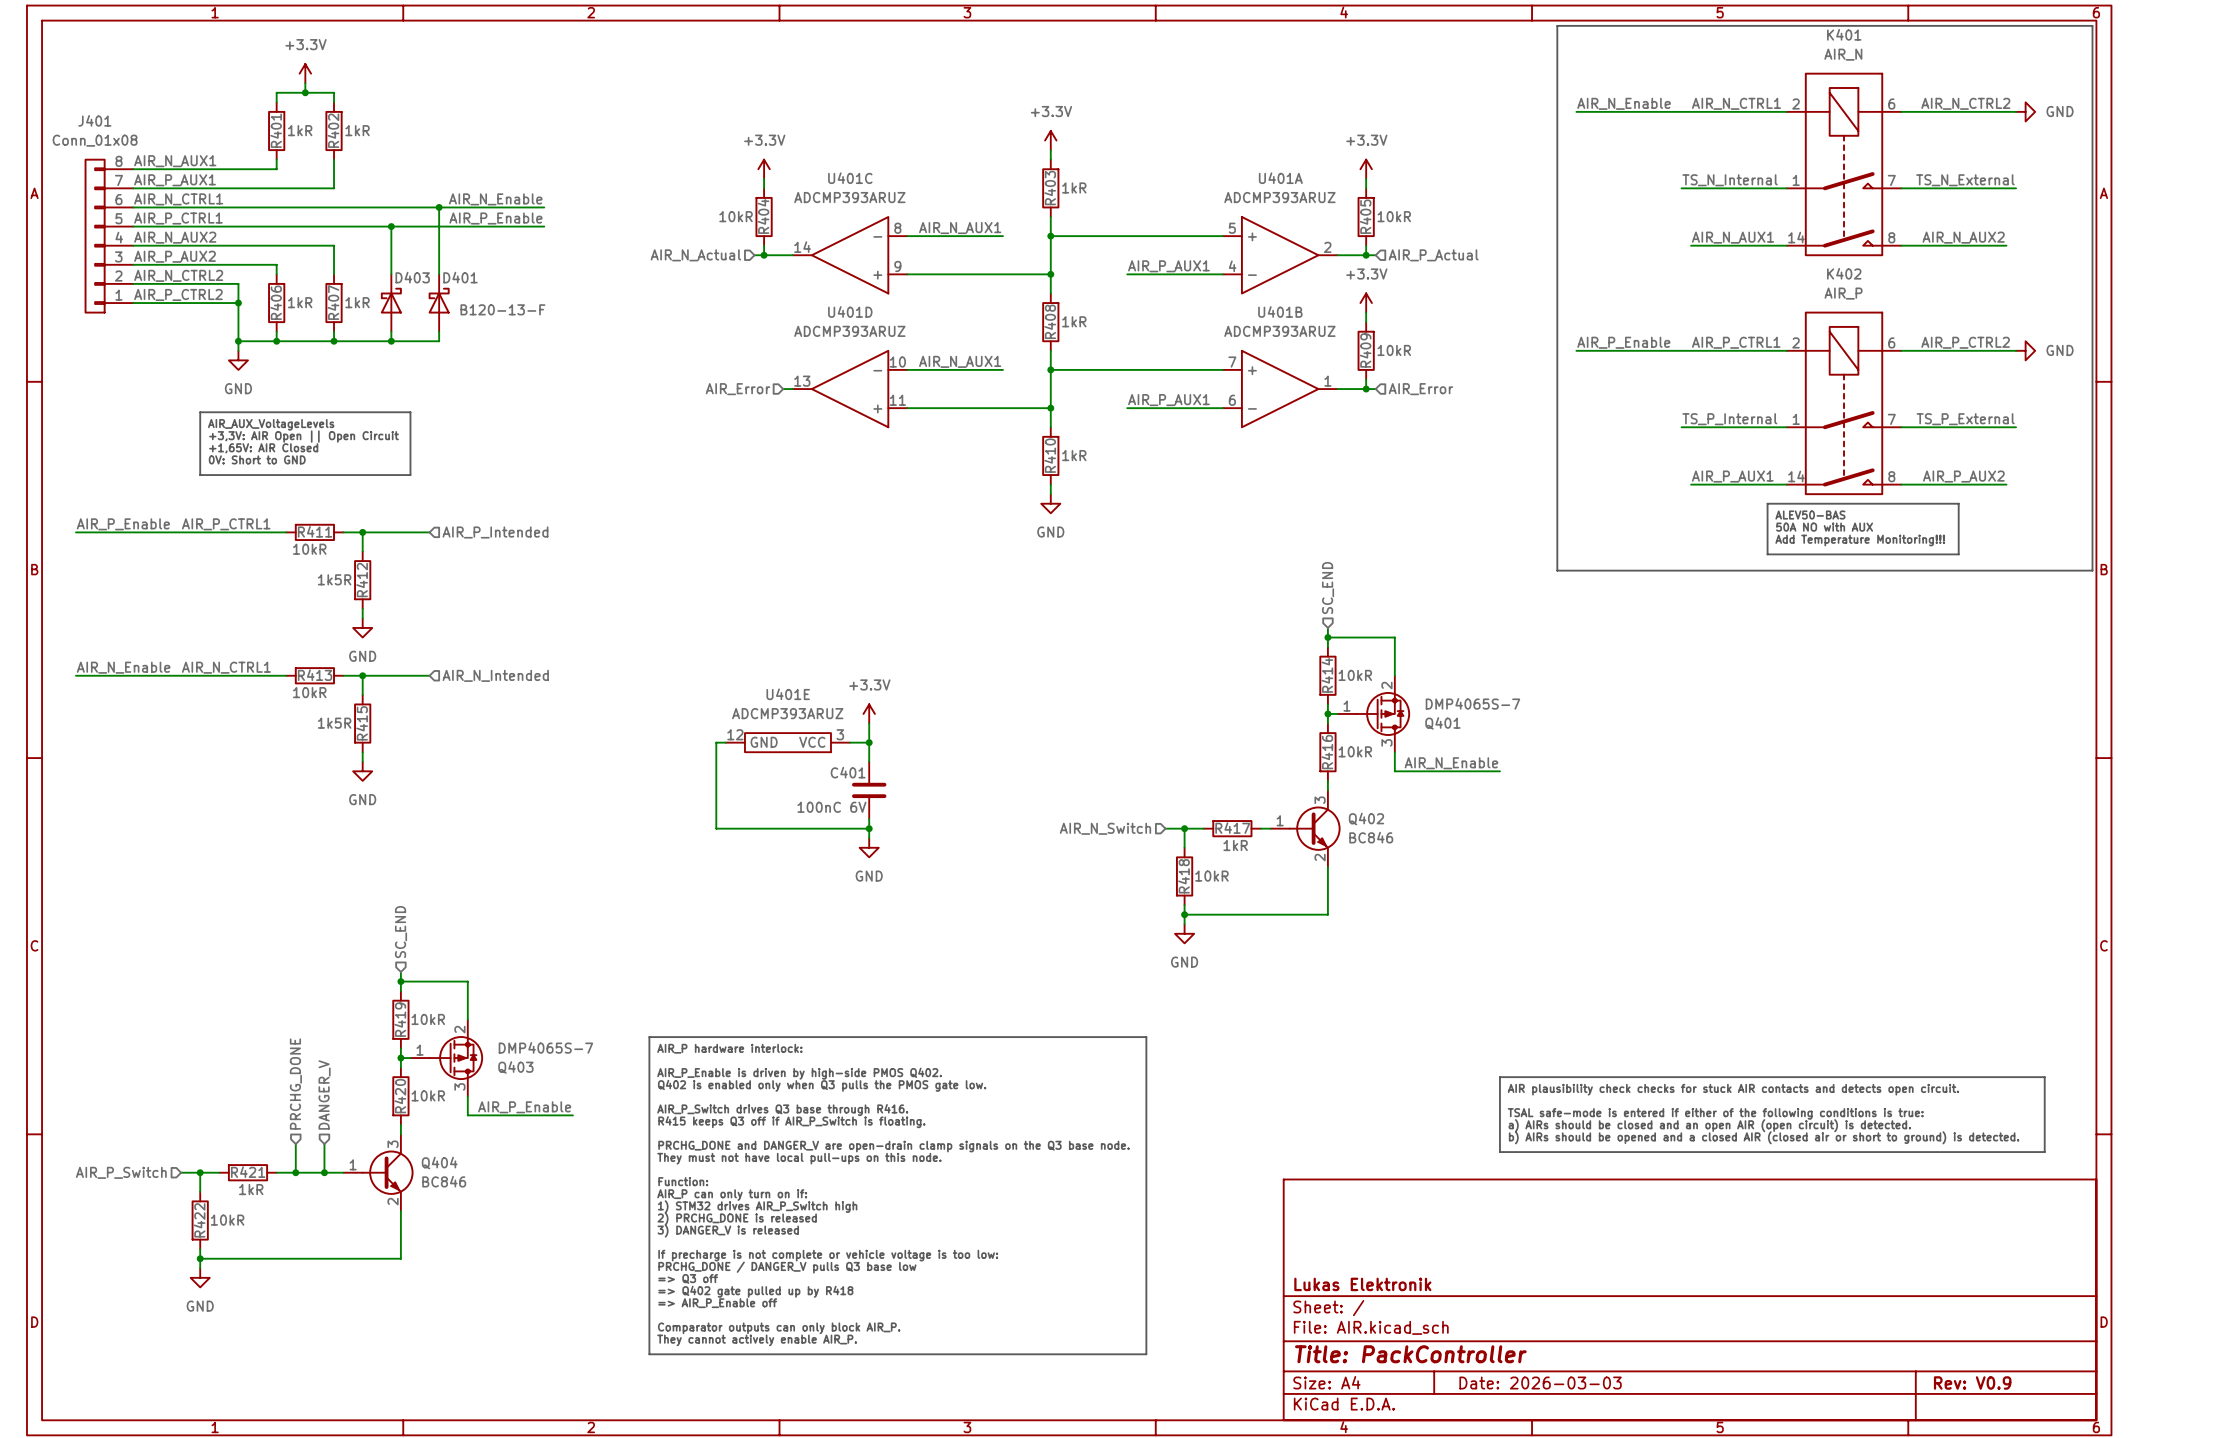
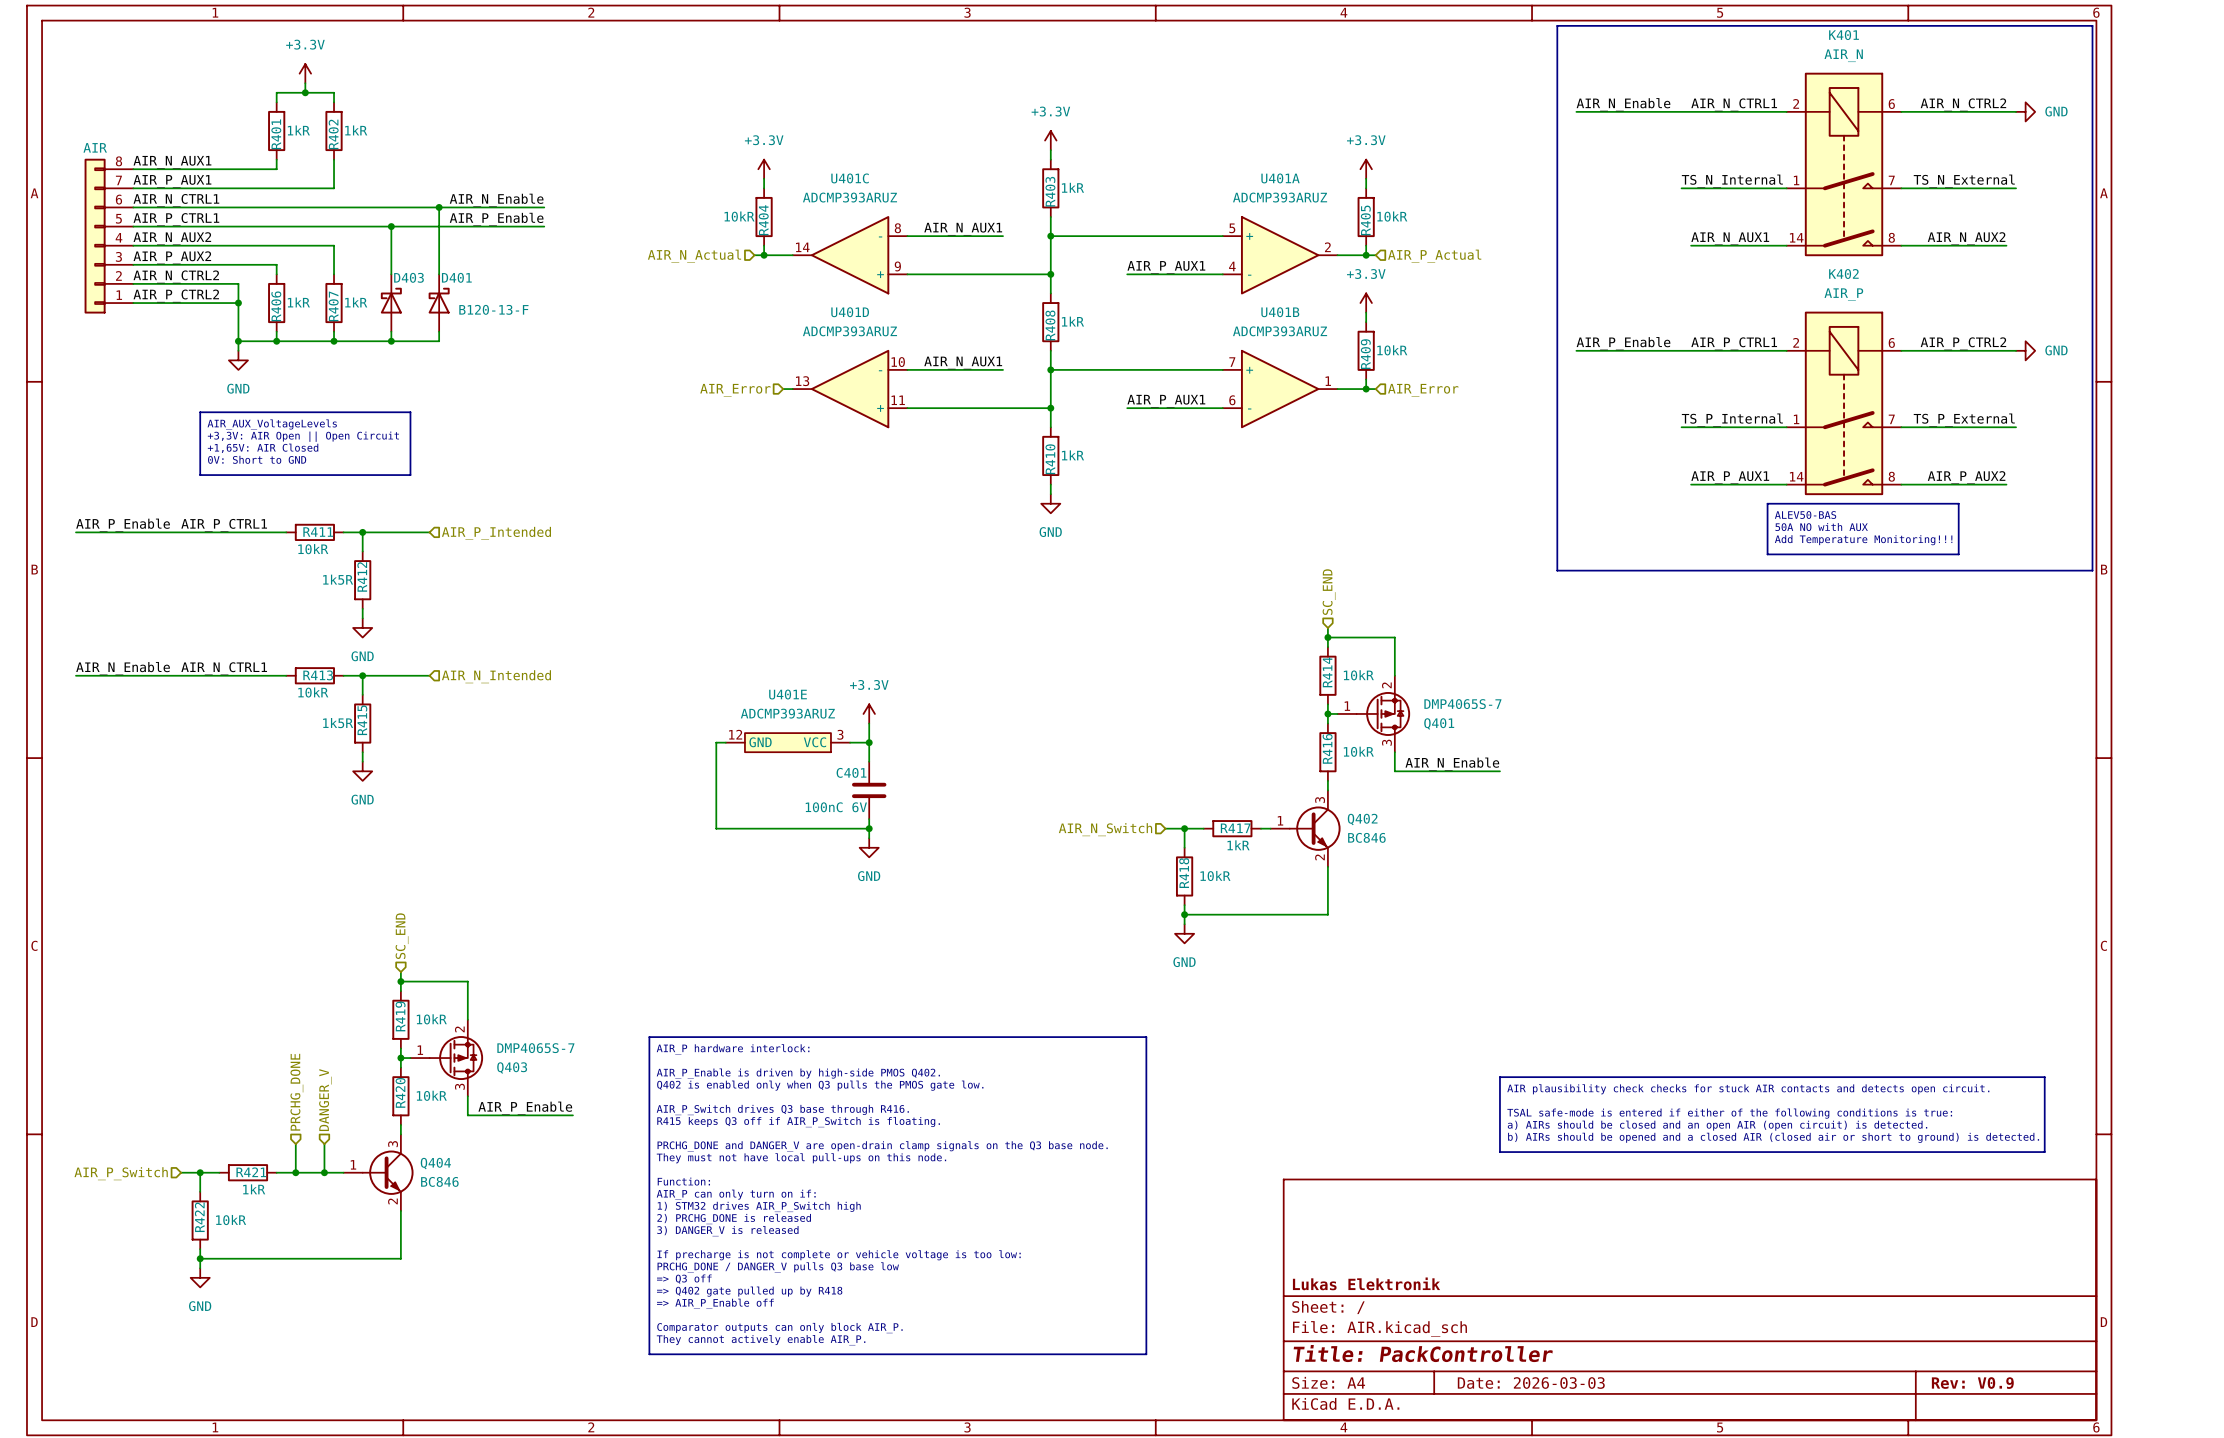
J401 name: J401 (94, 120) -> AIR (95, 147)
J401 value: Conn_01x08 (95, 140) -> none

